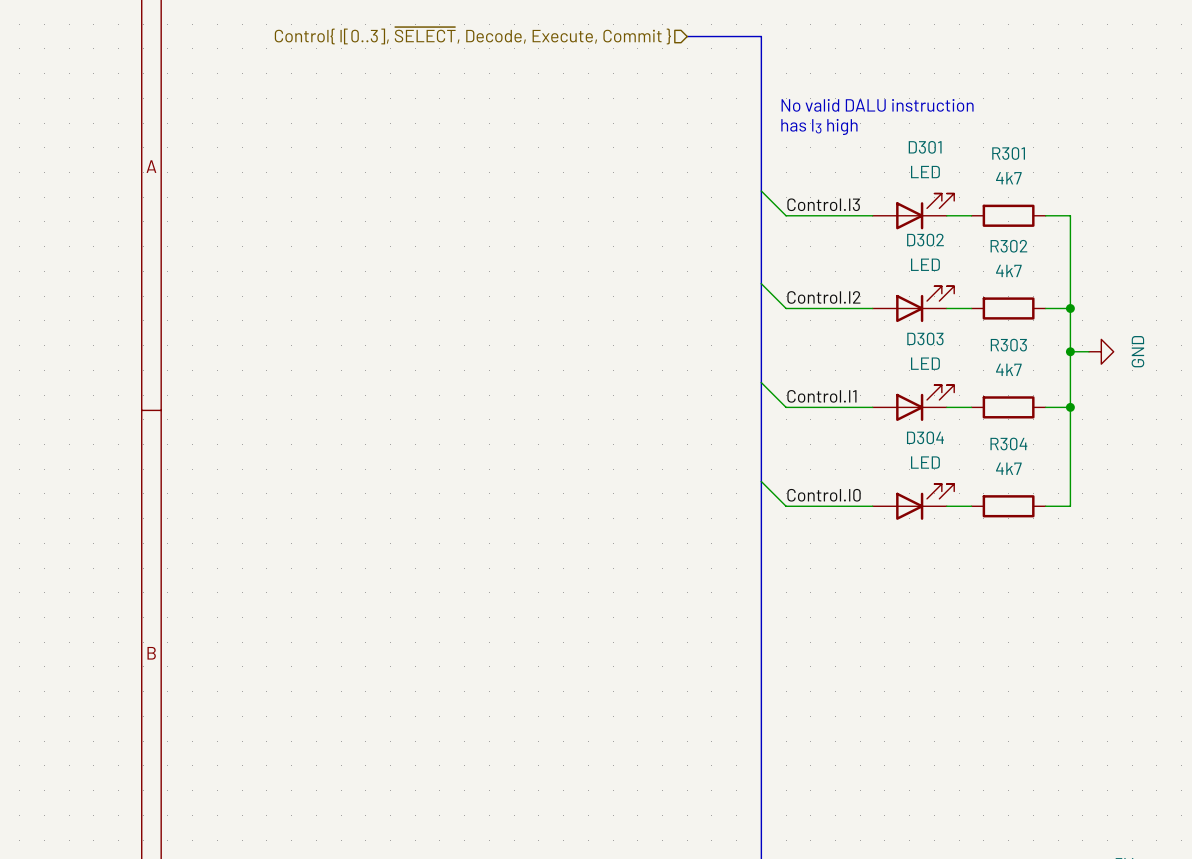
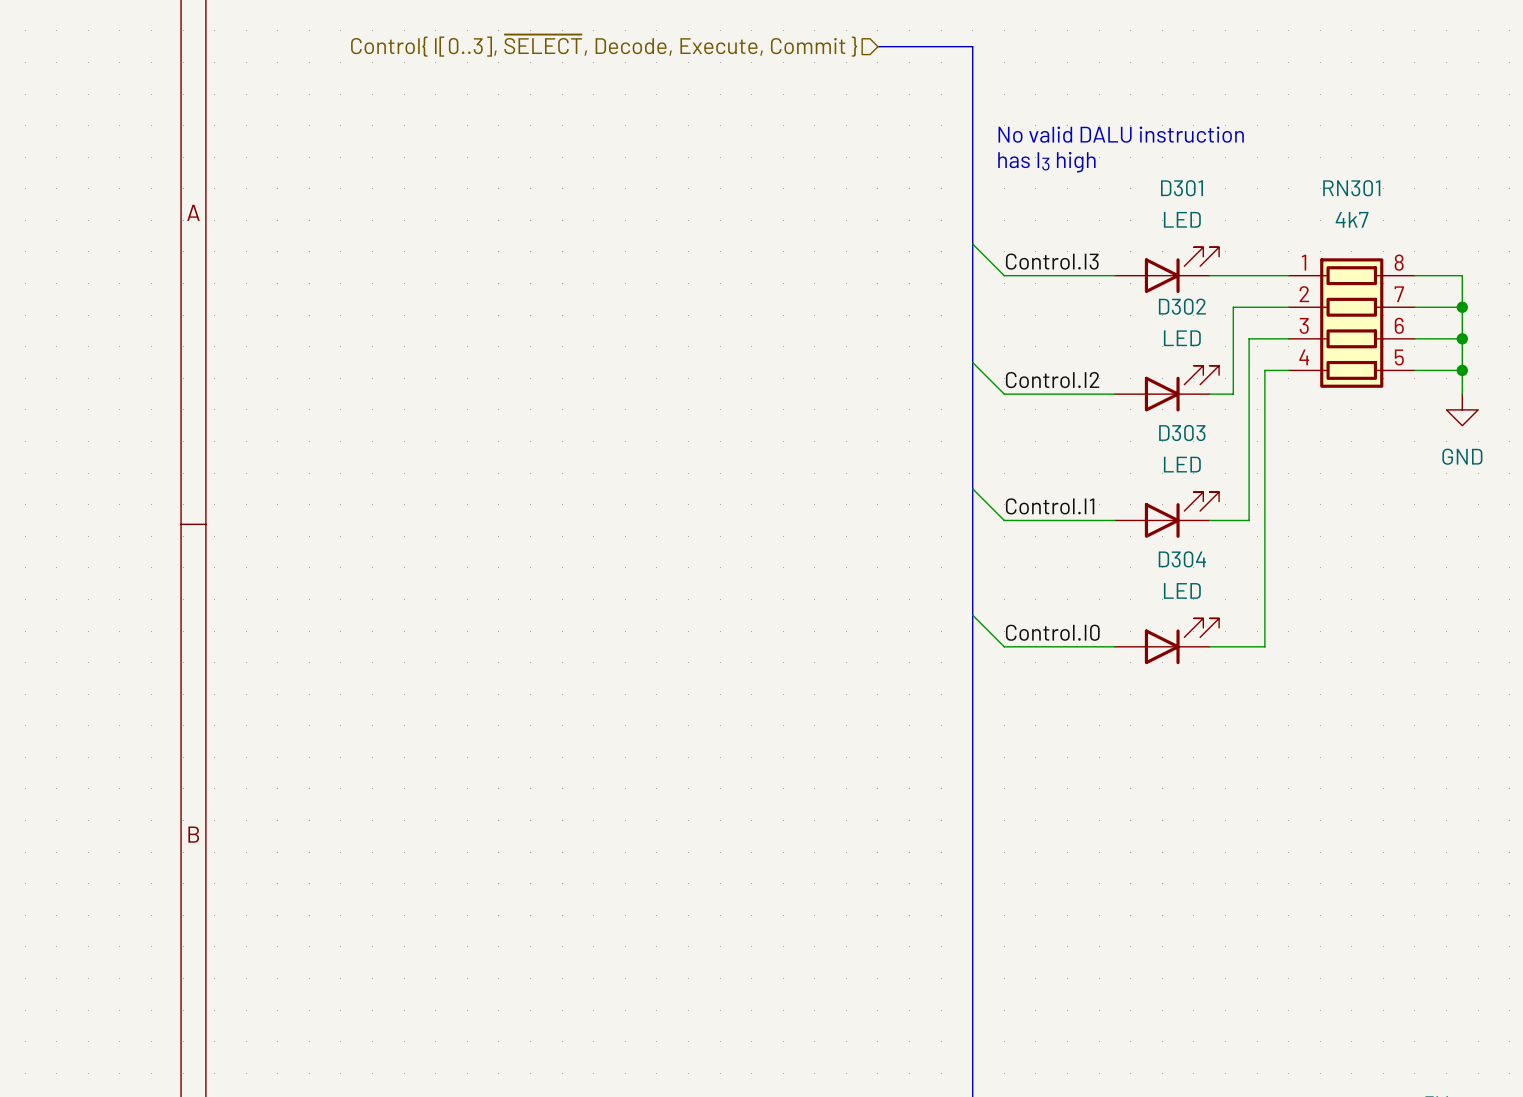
wire: none -> (1241, 275) (1288, 275)
R301: 4k7 (1008, 215) -> none
wire: (1045, 215) (1070, 215) (1070, 506) (1045, 506) -> none
wire: none -> (1414, 275) (1462, 275) (1462, 394)
wire: none -> (1414, 307) (1462, 307)
junction: none -> (1462, 307)
RN301: none -> 4k7 (1351, 323)
wire: none -> (1288, 338) (1249, 338) (1249, 520) (1241, 520)
wire: none -> (1414, 338) (1462, 338)
junction: none -> (1462, 338)
wire: none -> (1288, 370) (1264, 370) (1264, 646) (1241, 646)
wire: none -> (1414, 370) (1462, 370)
junction: none -> (1462, 370)
wire: (965, 308) (971, 308) -> (1233, 394) (1233, 307) (1288, 307)
R302: 4k7 (1008, 308) -> none
wire: (1045, 308) (1070, 308) -> none
junction: (1070, 308) -> none
wire: (1070, 351) (1088, 351) -> none
junction: (1070, 351) -> none
power symbol rotation: 0° (1101, 351) -> 90° clockwise (1462, 409)
power symbol position: GND (1101, 351) -> GND (1462, 409)
R303: 4k7 (1008, 407) -> none
wire: (1045, 407) (1070, 407) -> none
junction: (1070, 407) -> none
R304: 4k7 (1008, 506) -> none

